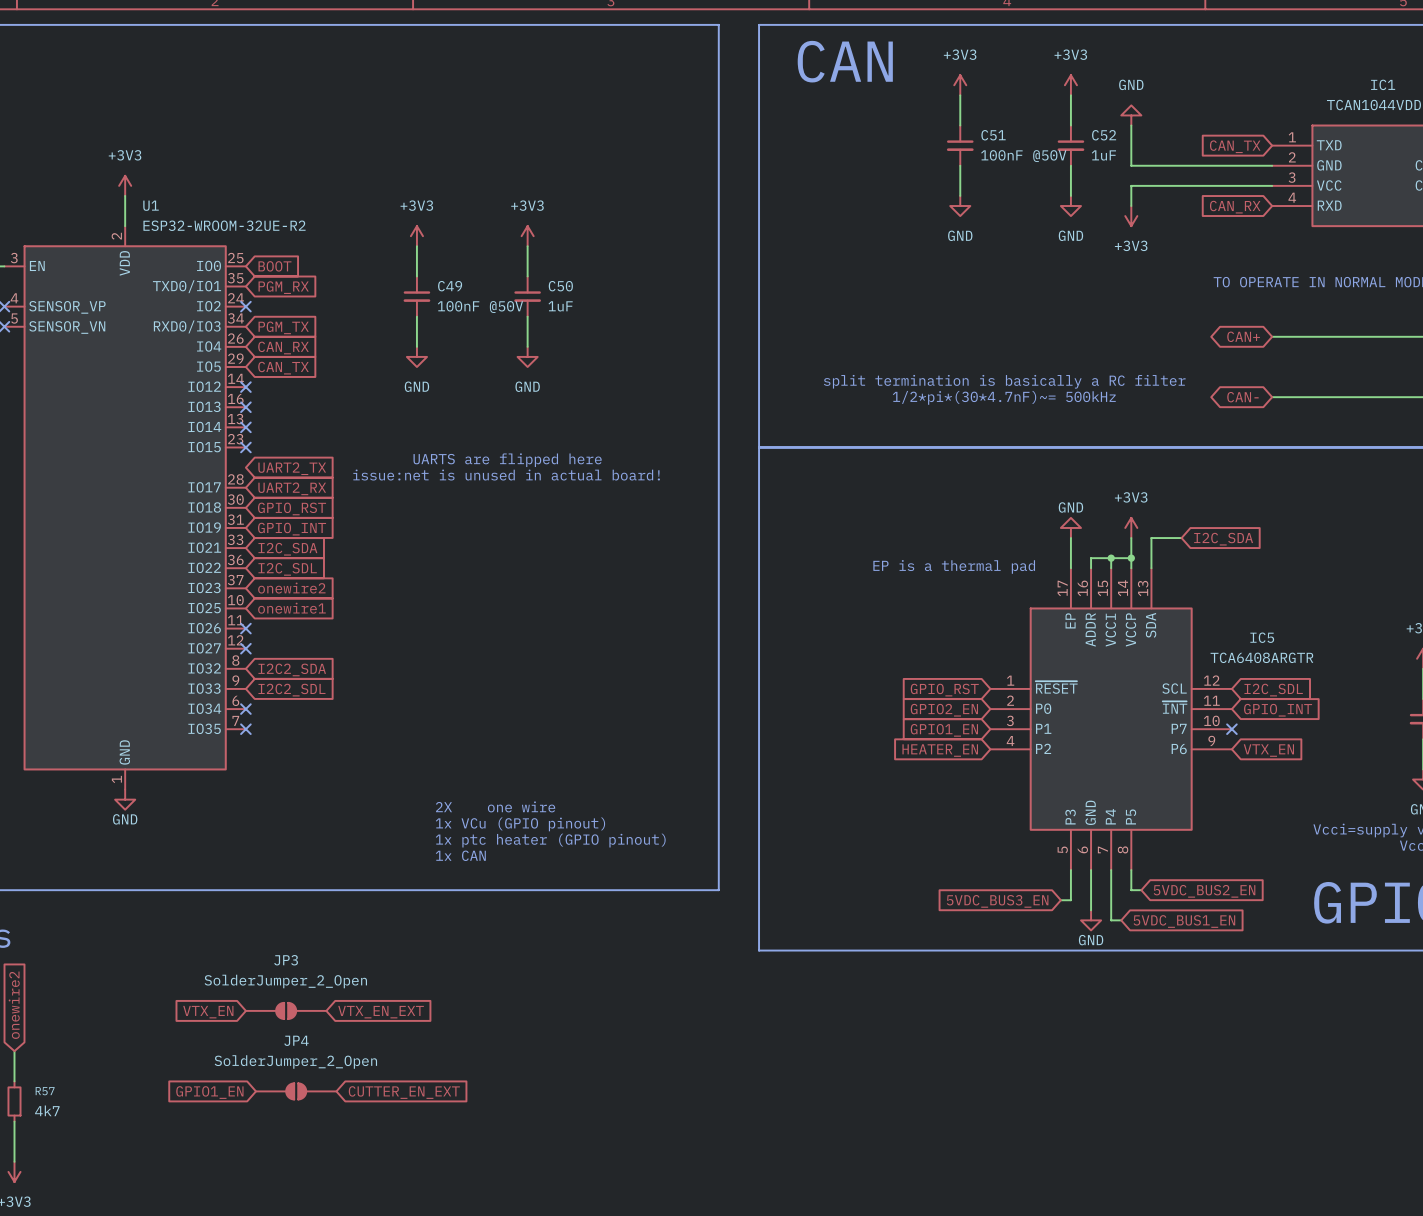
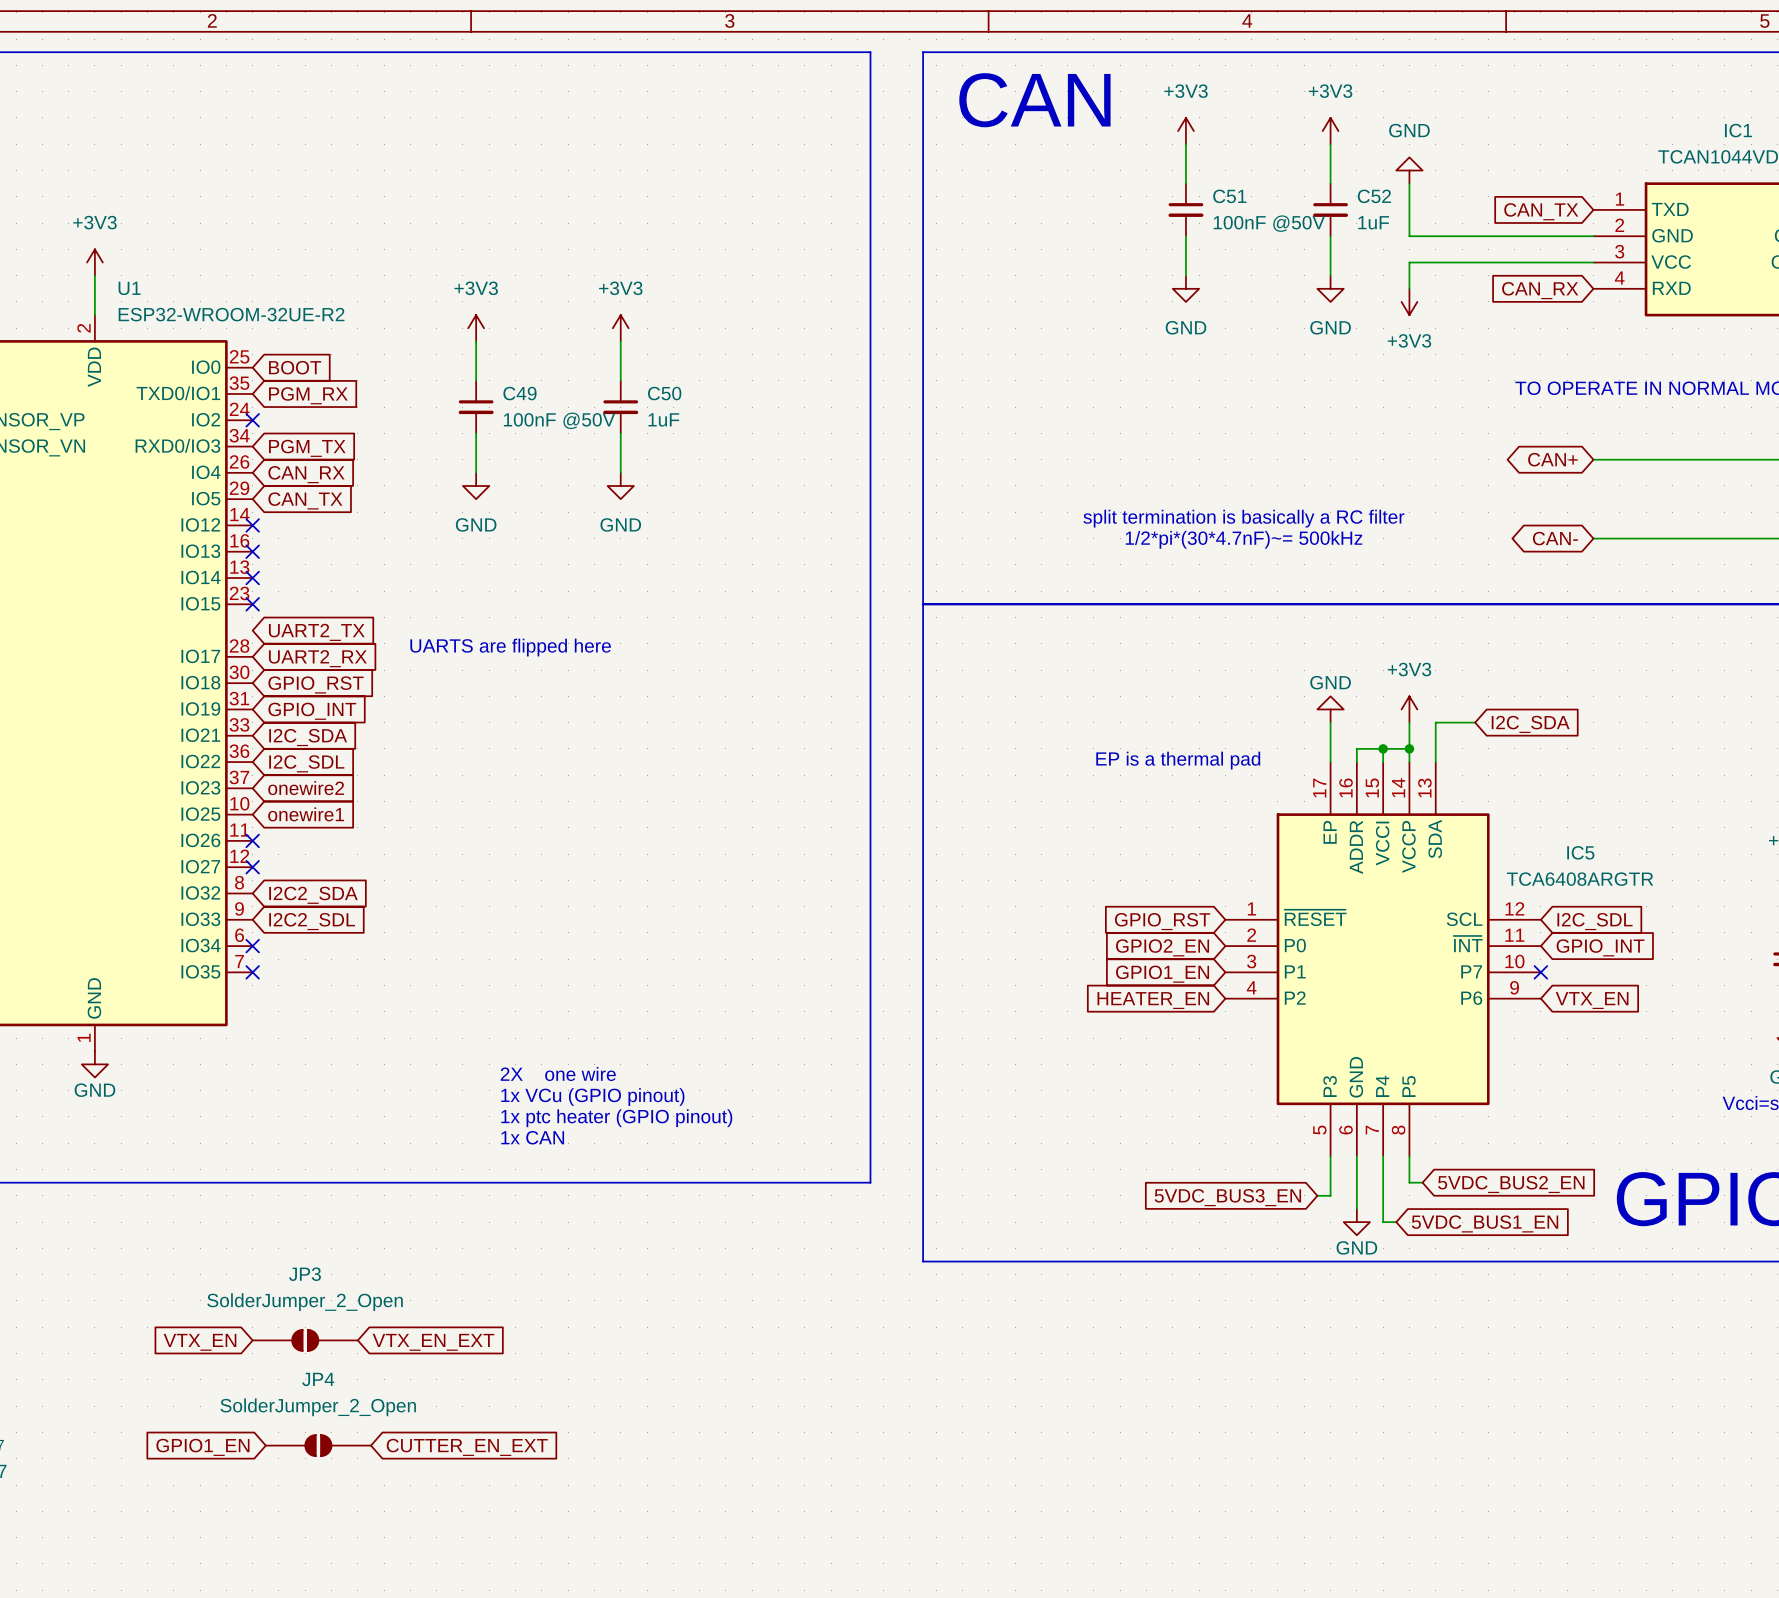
text position: UARTS are flipped here (507, 460) -> UARTS are flipped here (510, 647)
text: issue:net is unused in actual board! (506, 475) -> none

